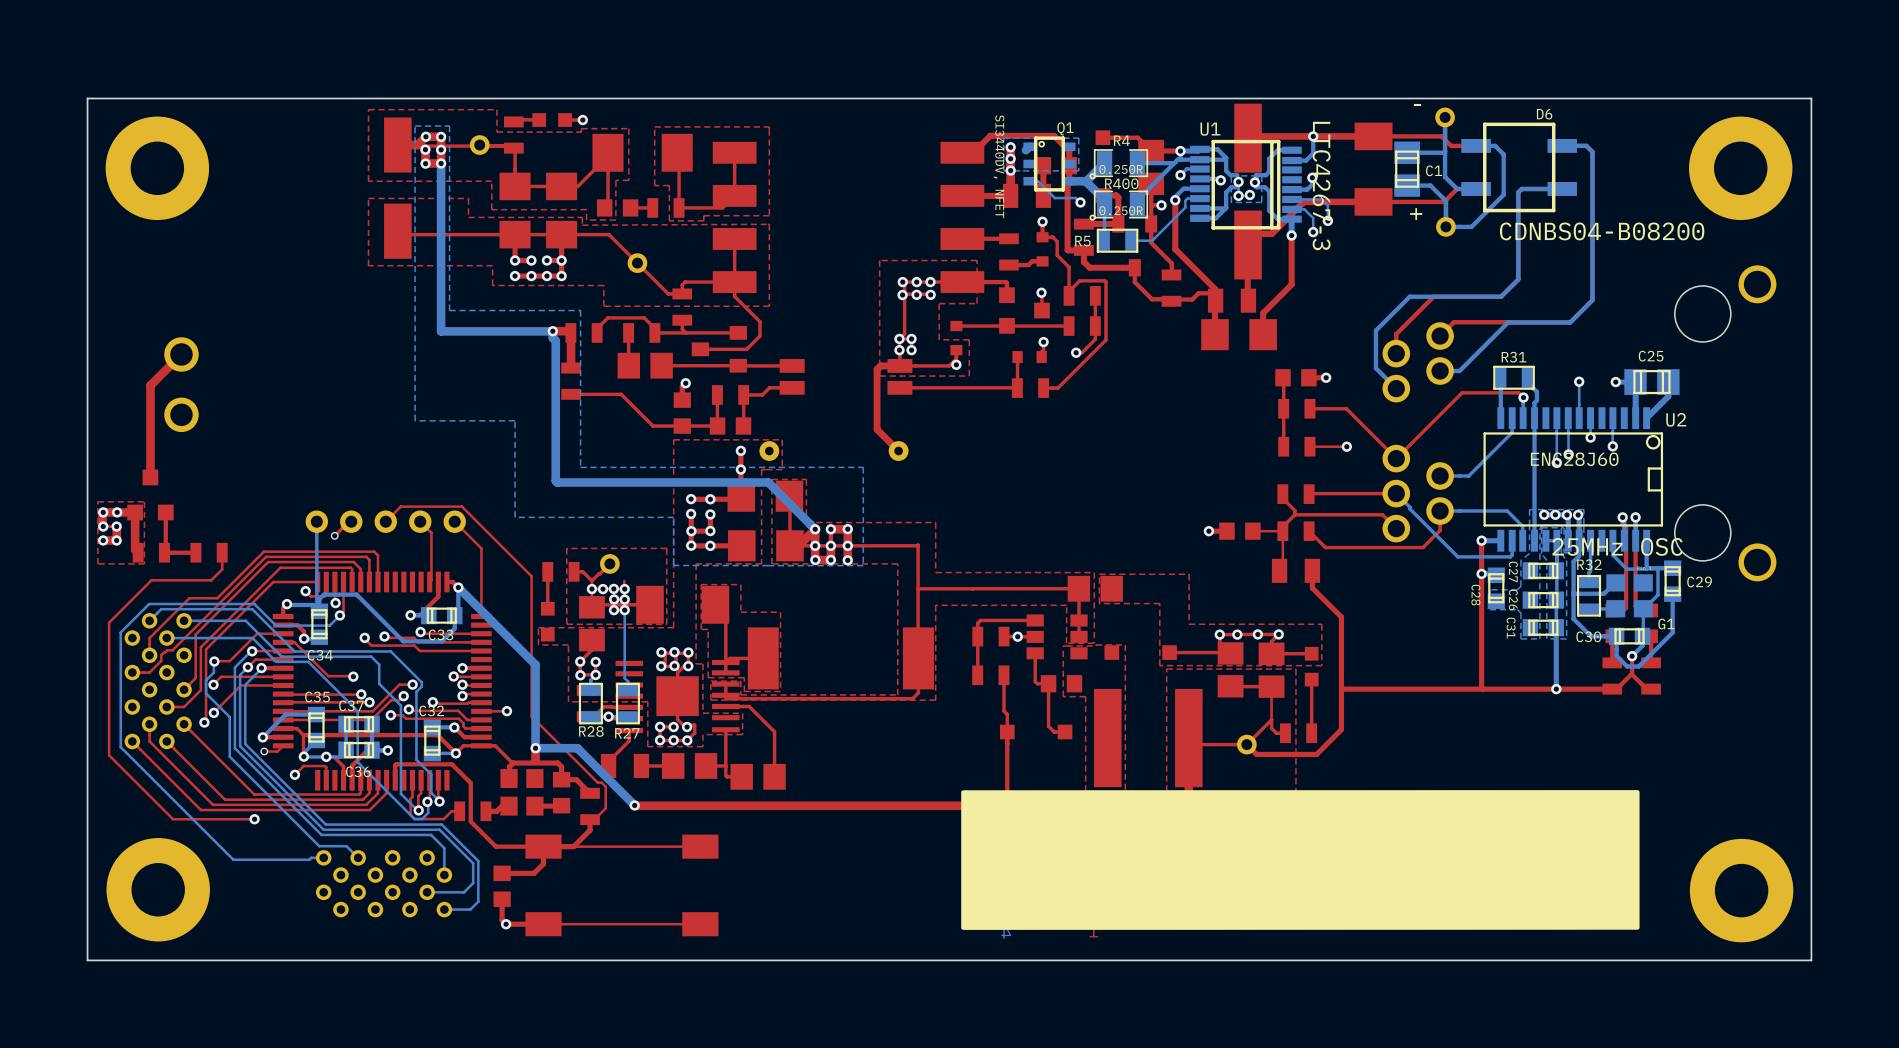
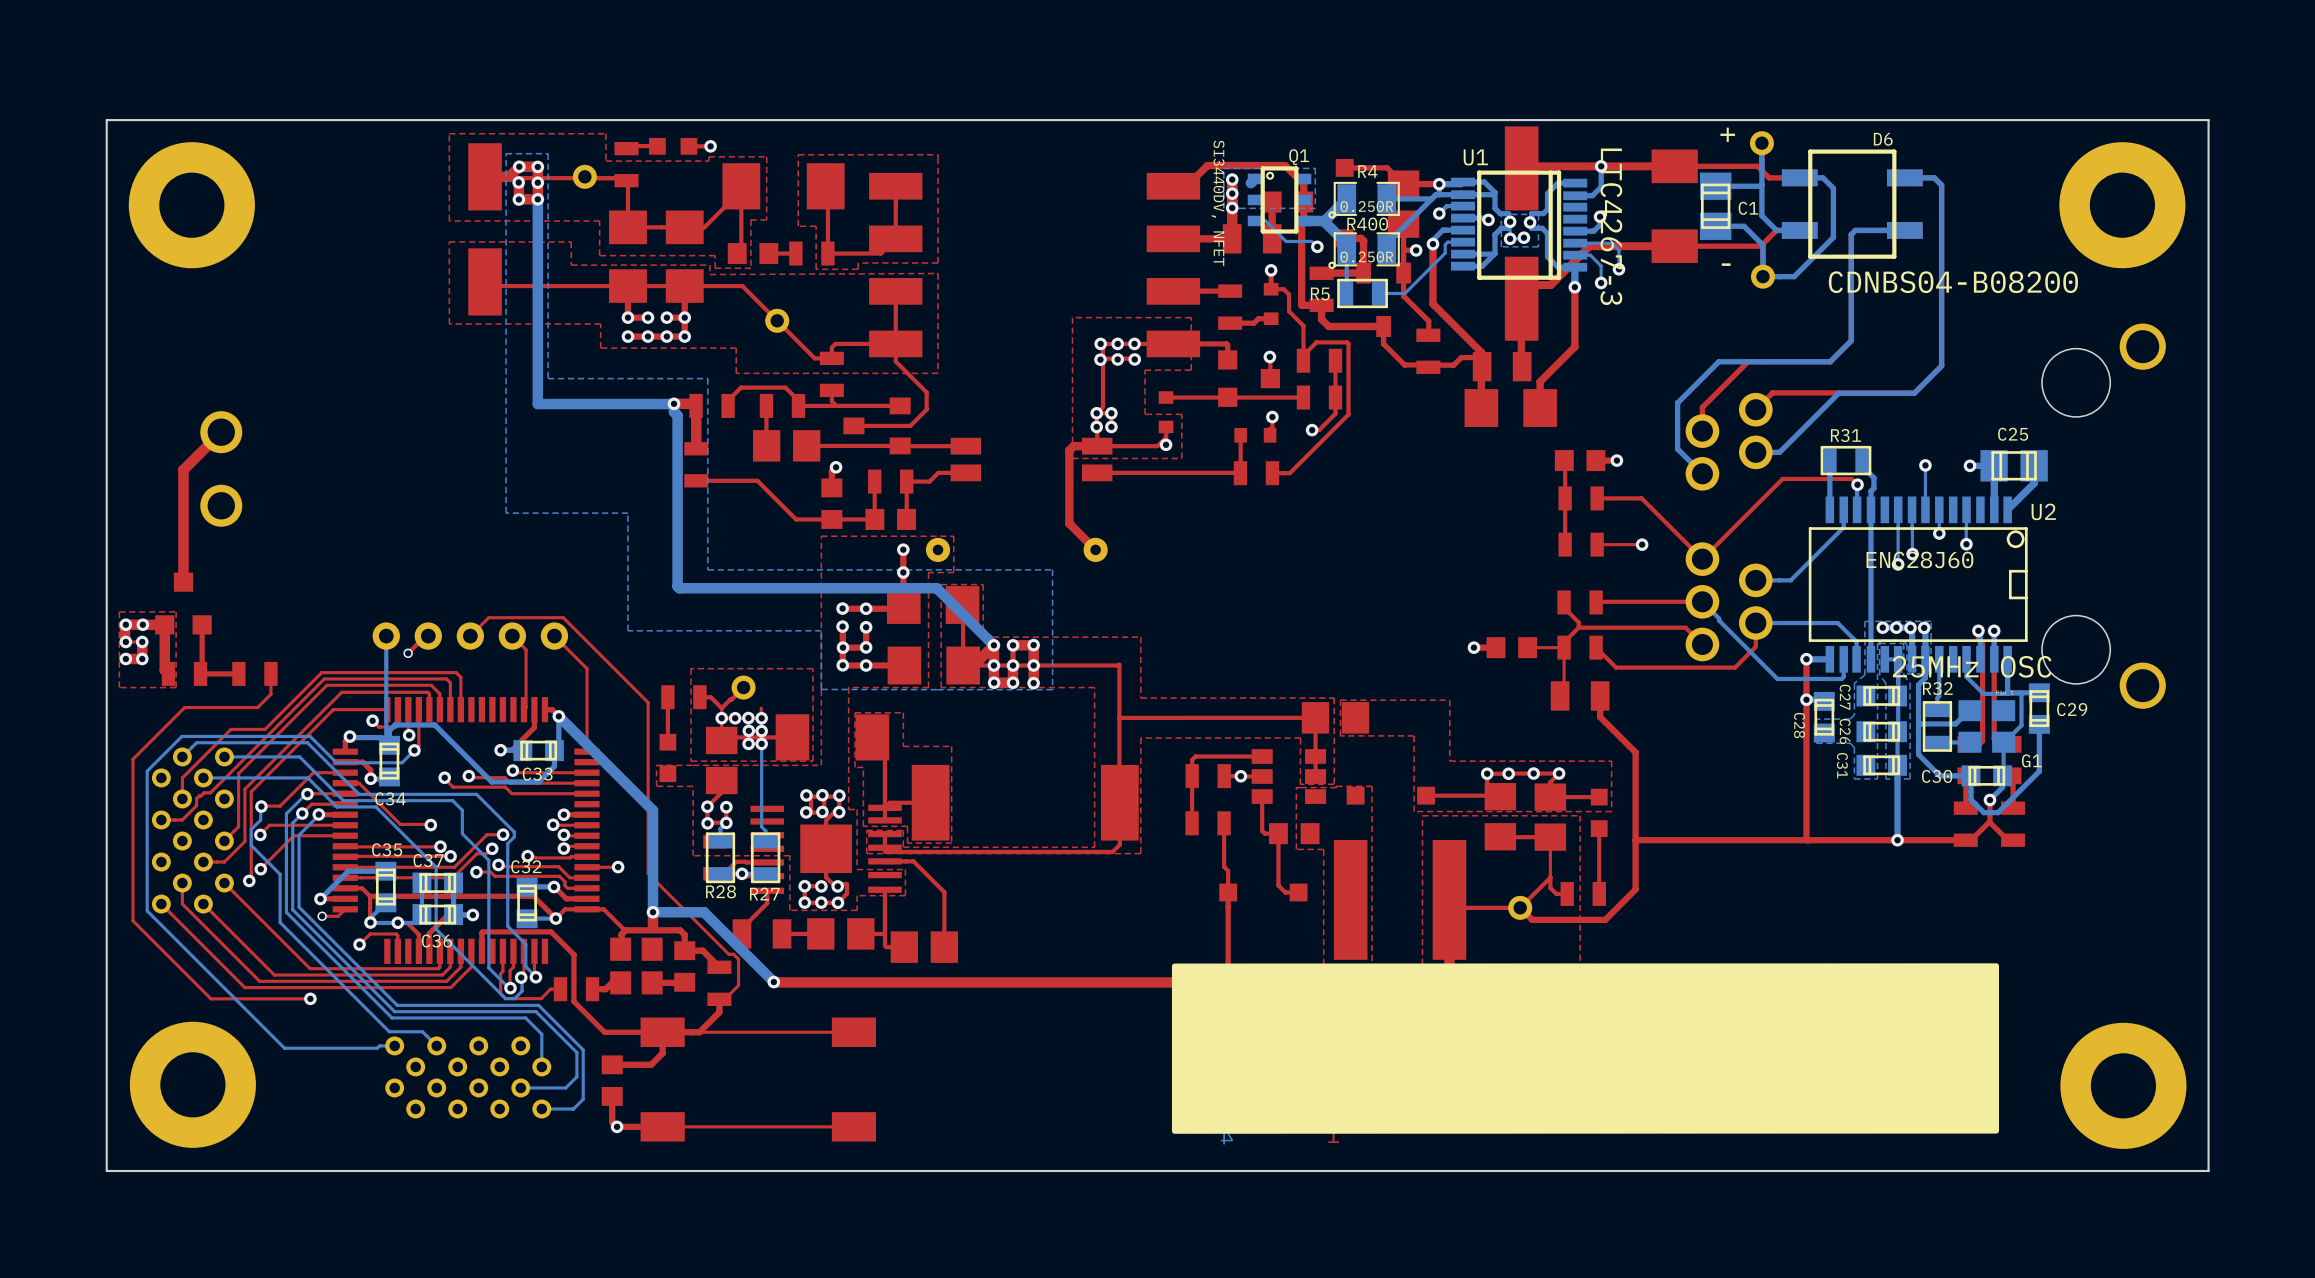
D6 text position: - (1417, 104) -> - (1726, 264)
D6 text position: + (1416, 213) -> + (1727, 134)

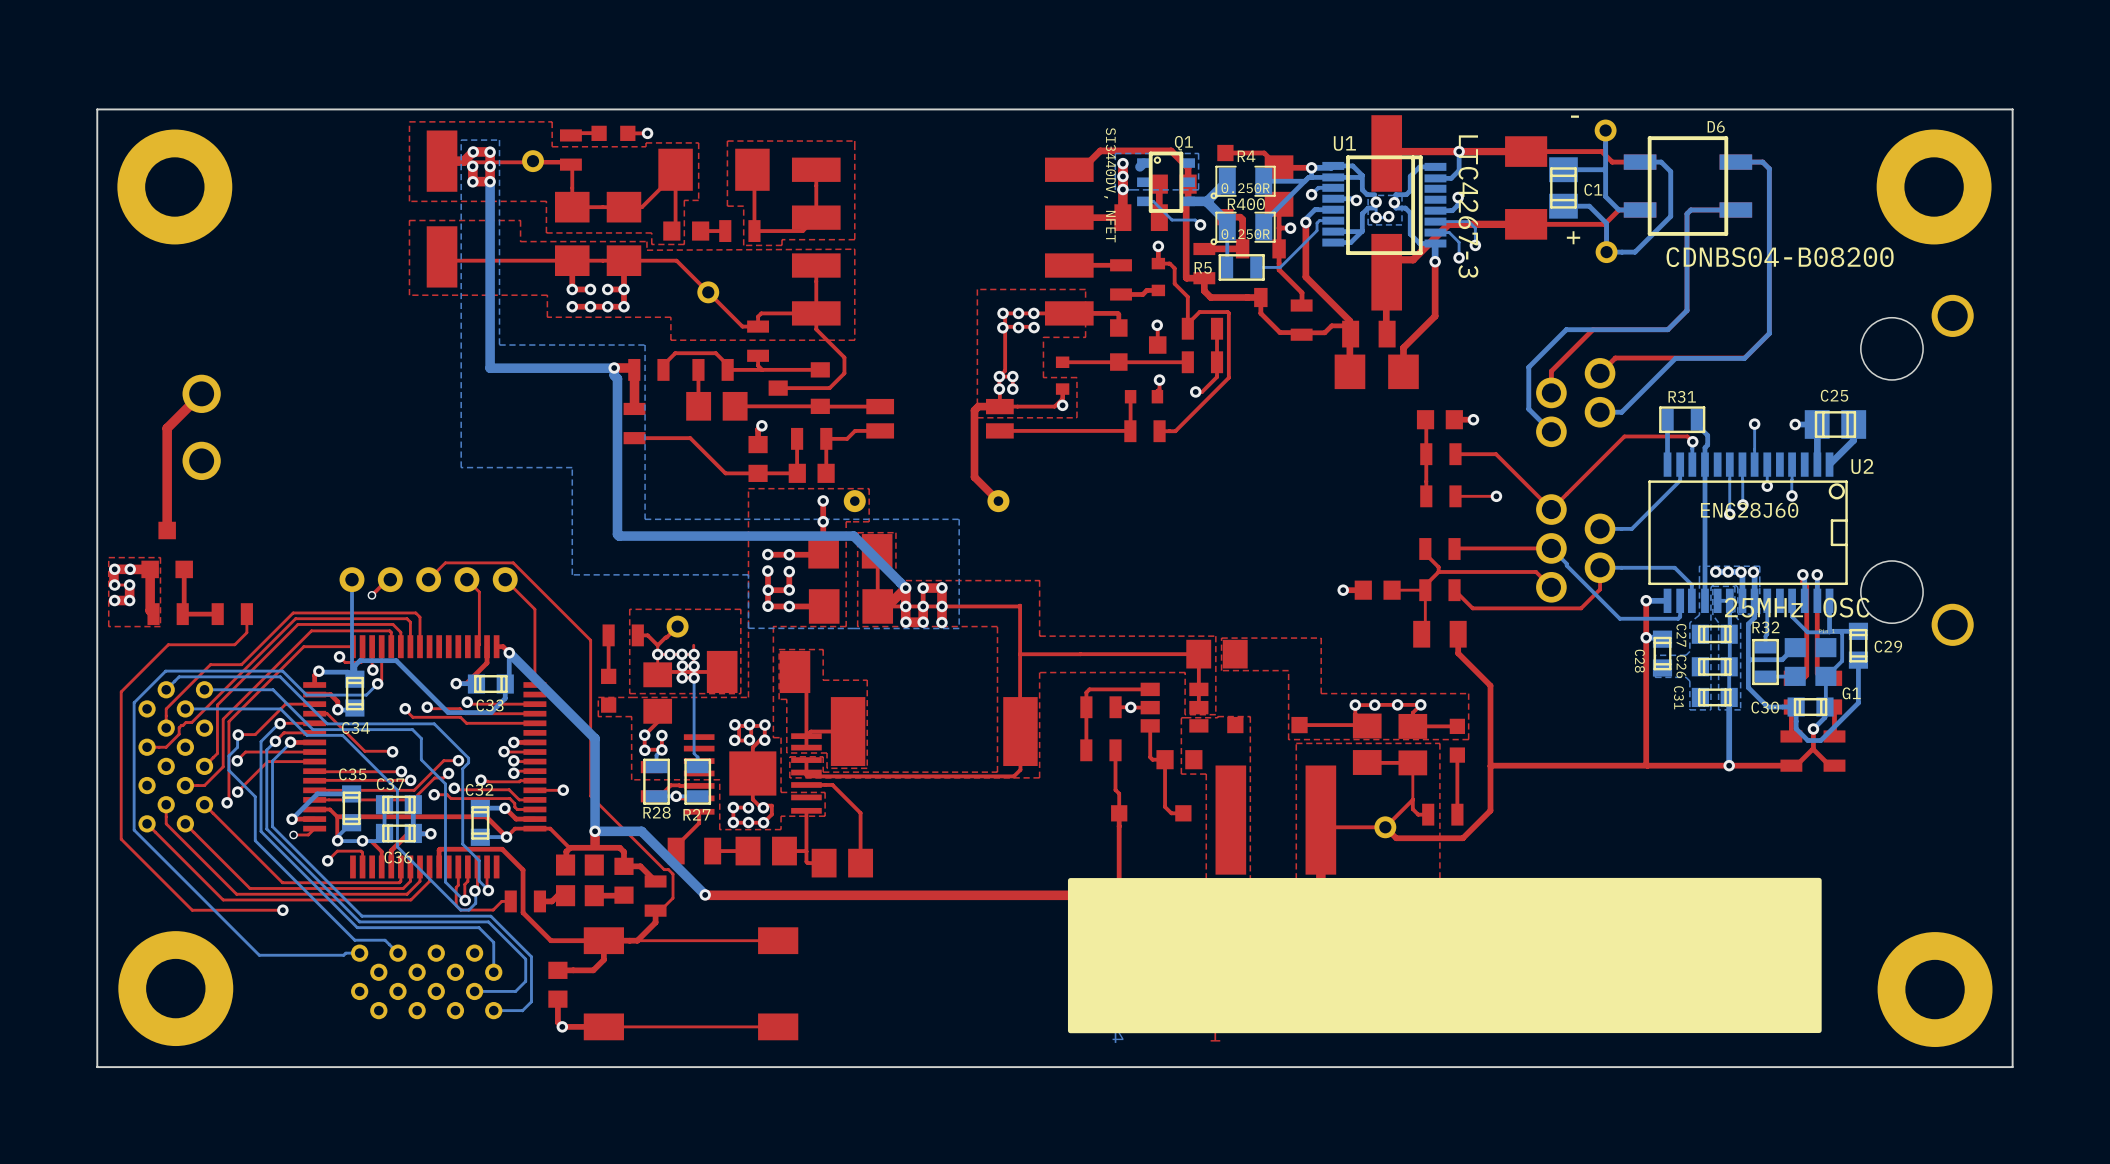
D6 text position: + (1727, 134) -> + (1573, 237)
D6 text position: - (1726, 264) -> - (1574, 116)

